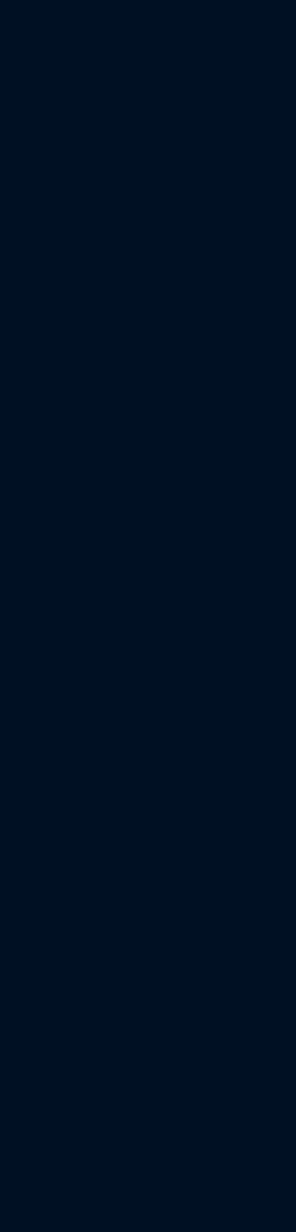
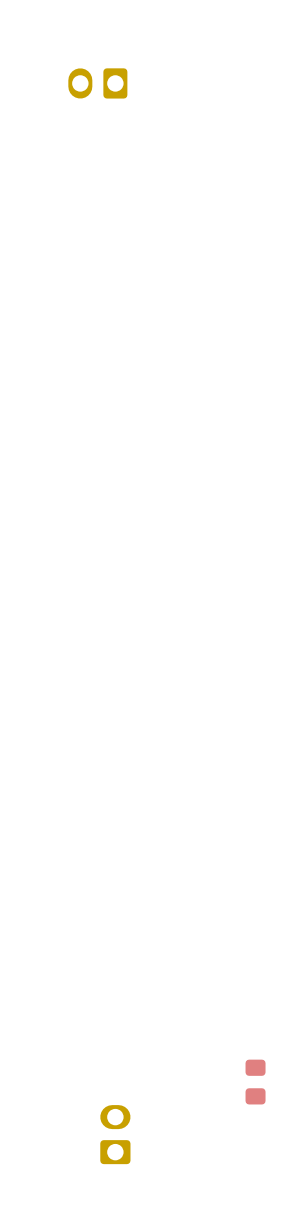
part: none -> (97, 83)
part: none -> (255, 1082)
part: none -> (115, 1134)

